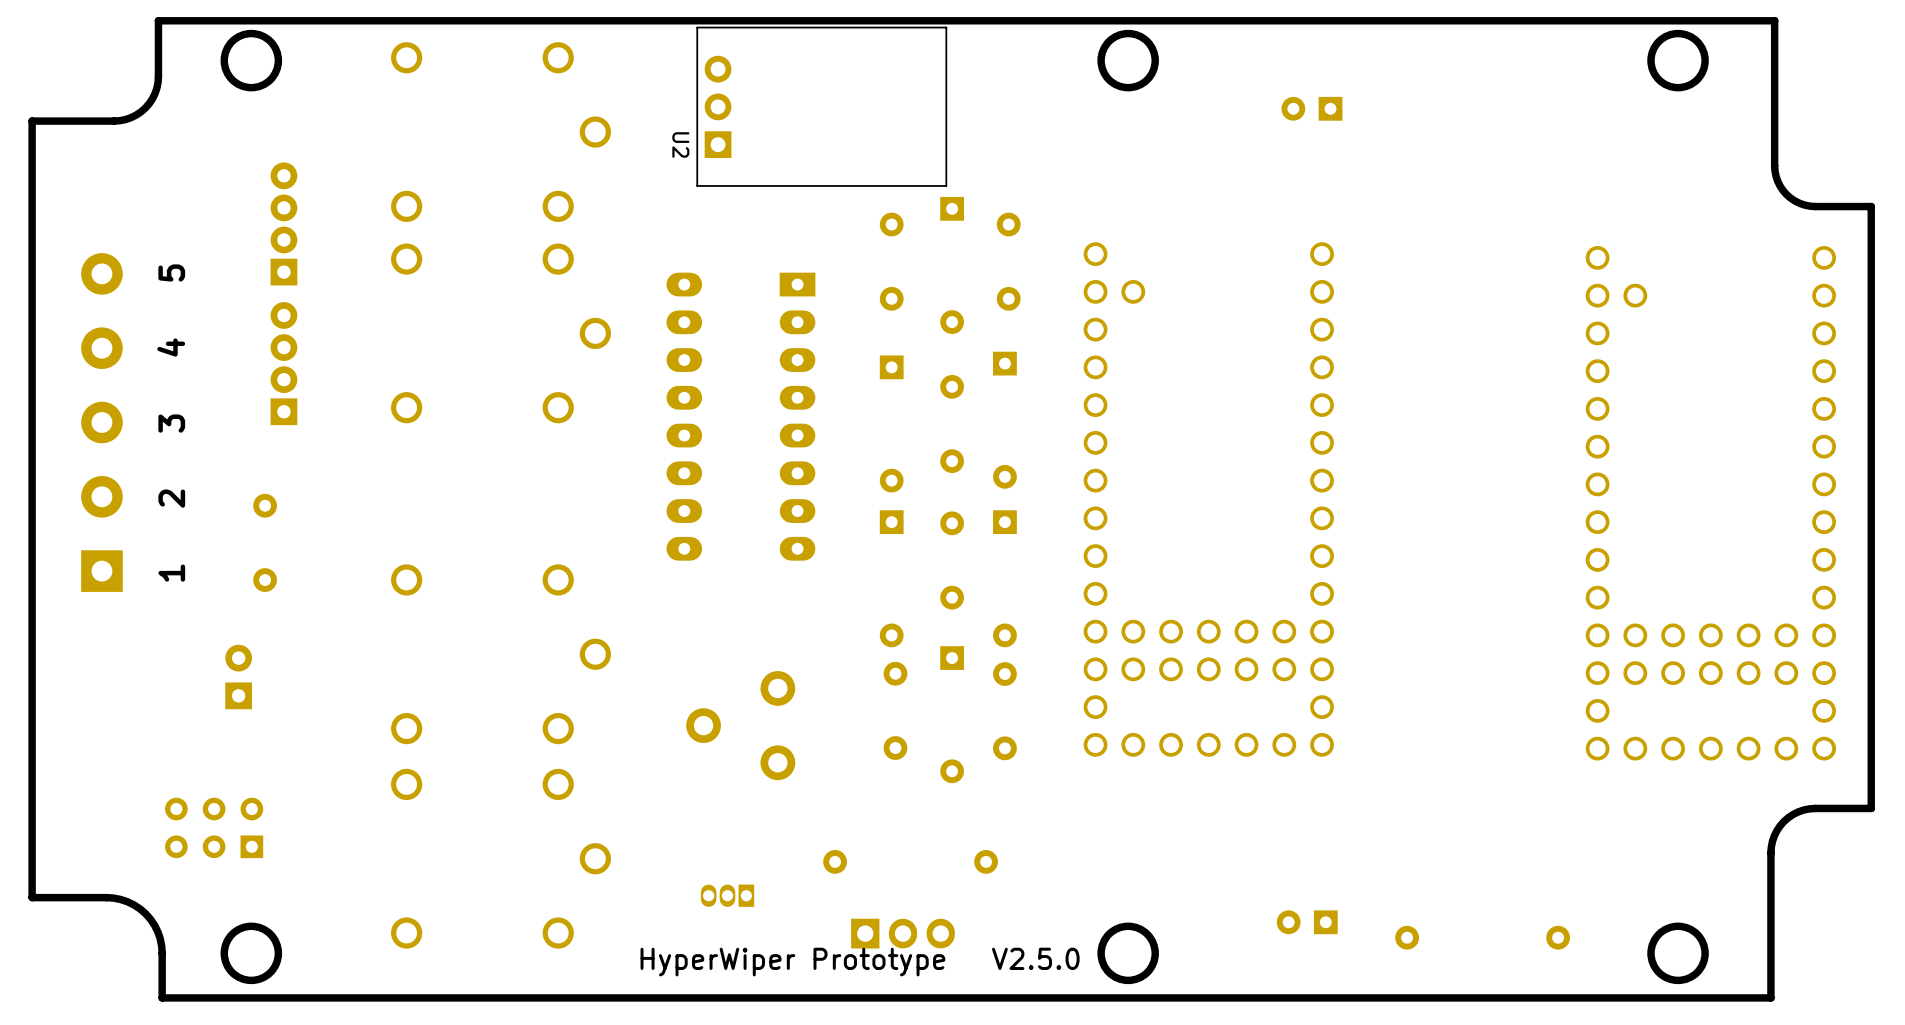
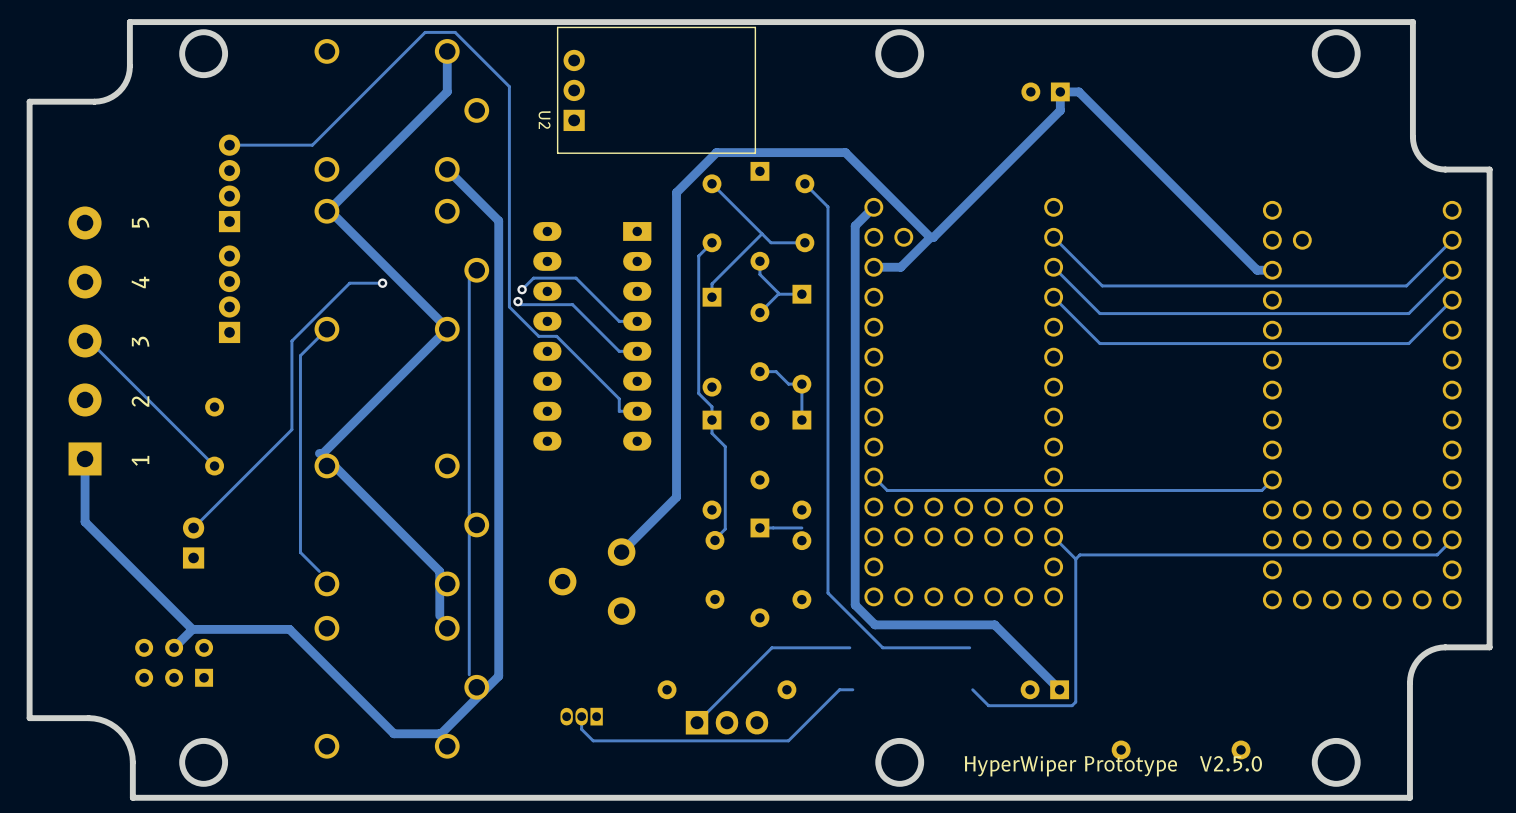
track: none -> (447, 51) (447, 91) (329, 210)
track: none -> (229, 145) (312, 145) (425, 32) (455, 32) (509, 86) (509, 306) (538, 336) (556, 336) (619, 398) (619, 411) (637, 411)
track: none -> (447, 169) (498, 220) (498, 676) (441, 733) (393, 733) (289, 629) (192, 629)
track: none -> (712, 183) (770, 242) (804, 242)
track: none -> (804, 183) (827, 206) (827, 593) (882, 647) (969, 647)
track: none -> (873, 207) (855, 225) (855, 605) (875, 624) (994, 624) (1059, 689)
track: none -> (329, 210) (447, 329) (322, 454)
track: none -> (762, 233) (712, 283) (712, 297)
track: none -> (1053, 237) (1102, 285) (1406, 285) (1452, 240)
track: none -> (930, 237) (900, 267) (873, 267)
track: none -> (930, 237) (933, 237) (1060, 110) (1060, 91) (1078, 91) (1257, 270) (1272, 270)
track: none -> (930, 237) (845, 152) (716, 152) (676, 192) (676, 497) (621, 552)
track: none -> (712, 242) (698, 256) (698, 393) (712, 406) (712, 433) (725, 446) (725, 529) (712, 542)
track: none -> (759, 261) (759, 274) (778, 294)
track: none -> (1053, 267) (1099, 313) (1408, 313) (1452, 270)
track: none -> (476, 270) (469, 277) (469, 674)
track: none -> (382, 283) (349, 283) (291, 341) (291, 429) (193, 528)
via: none -> (382, 283)
track: none -> (522, 289) (533, 278) (576, 278) (619, 321) (637, 321)
via: none -> (522, 289)
track: none -> (778, 294) (759, 312)
track: none -> (801, 294) (778, 294)
track: none -> (1053, 297) (1099, 343) (1408, 343) (1452, 300)
track: none -> (518, 301) (521, 304) (572, 304) (619, 351) (637, 351)
via: none -> (518, 301)
track: none -> (326, 329) (300, 355) (300, 552) (319, 571)
track: none -> (85, 340) (89, 340) (214, 466)
track: none -> (759, 371) (776, 371) (788, 384) (801, 384) (801, 420)
track: none -> (319, 453) (321, 453) (439, 571) (439, 615)
track: none -> (85, 458) (85, 521) (192, 629)
track: none -> (873, 477) (887, 490) (1261, 490) (1272, 480)
track: none -> (801, 527) (759, 527)
track: none -> (1053, 536) (1075, 559)
track: none -> (1452, 539) (1437, 554) (1079, 554) (1075, 559)
track: none -> (1075, 559) (1075, 702) (1072, 705) (988, 705) (972, 689)
track: none -> (192, 629) (174, 647)
track: none -> (849, 647) (771, 647) (697, 722)
track: none -> (852, 689) (839, 689) (788, 740) (593, 740) (581, 729) (581, 716)
part position: (1307, 922) -> (1044, 689)
part position: (903, 933) -> (726, 722)
text: none -> HyperWiper Prototype V2.5.0 (1113, 766)
text: HyperWiper Prototype V2.5.0 (860, 962) -> none

